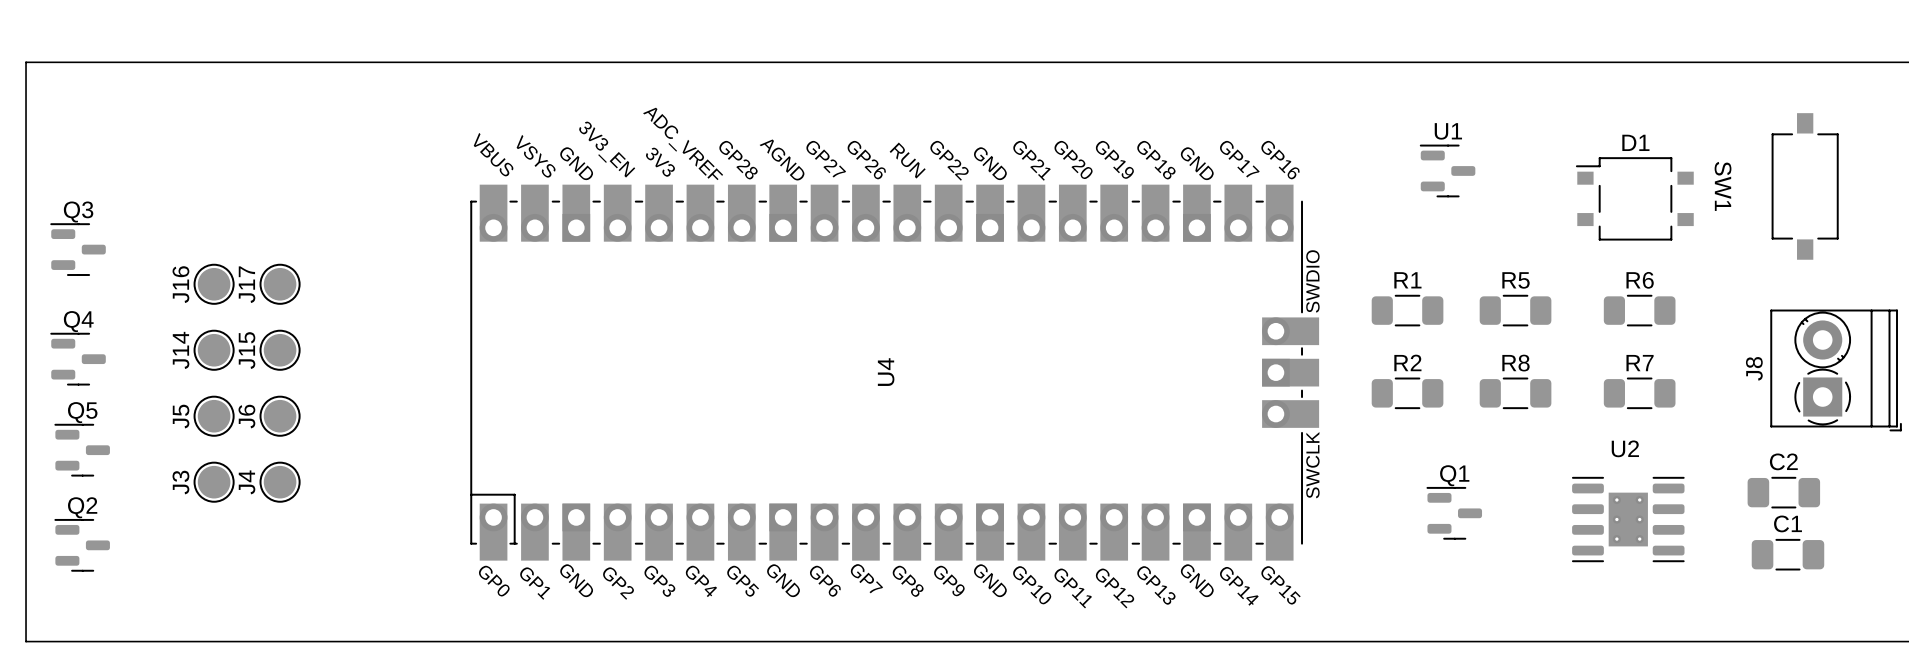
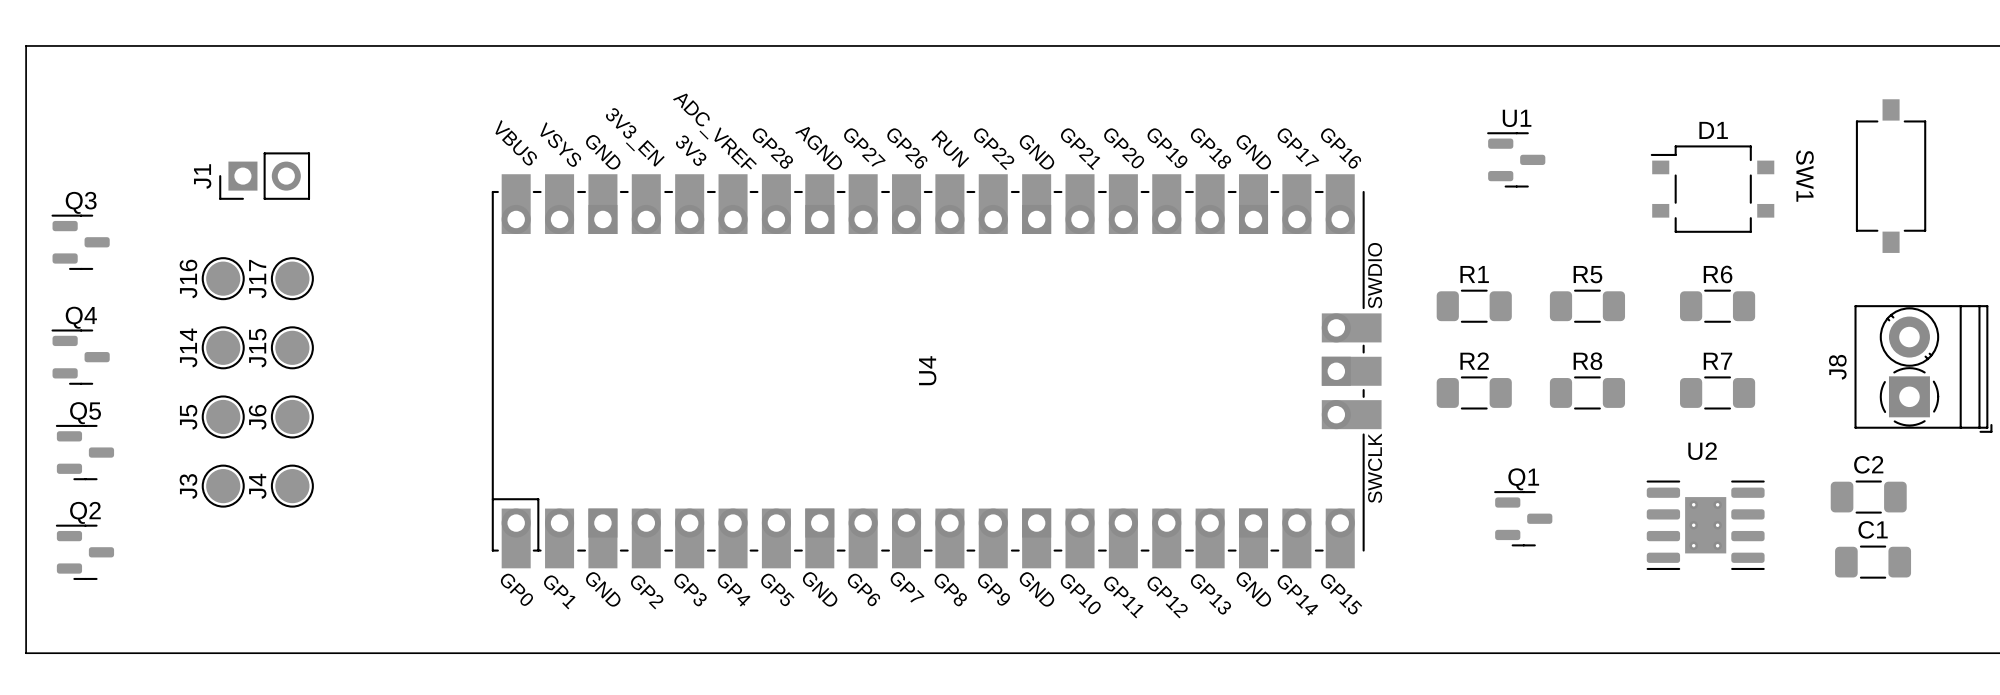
J1: none -> (264, 176)

